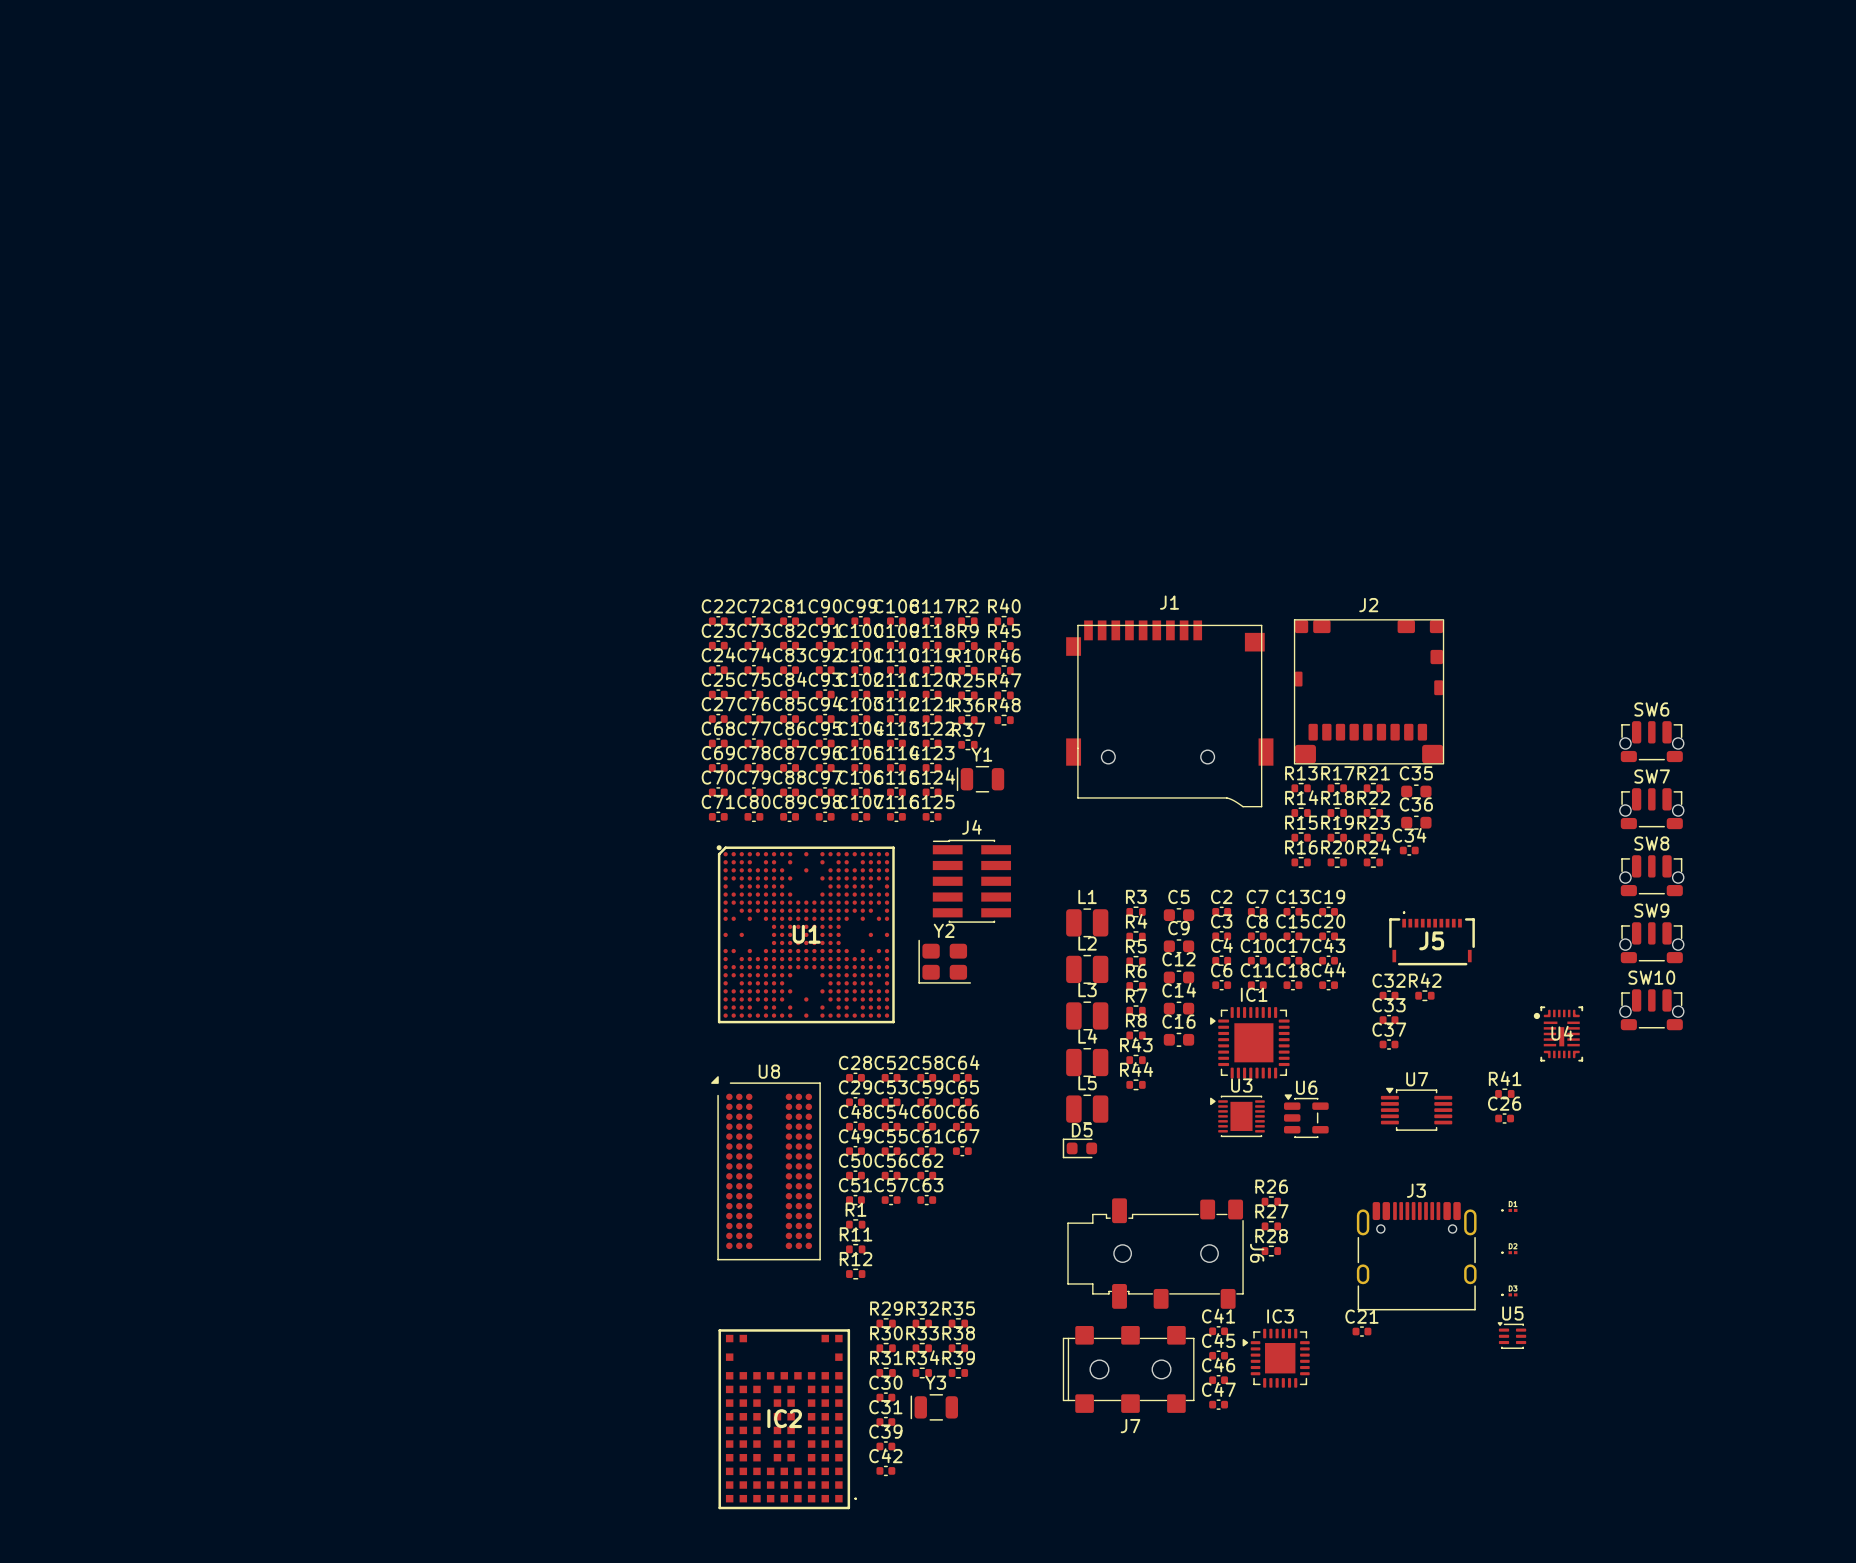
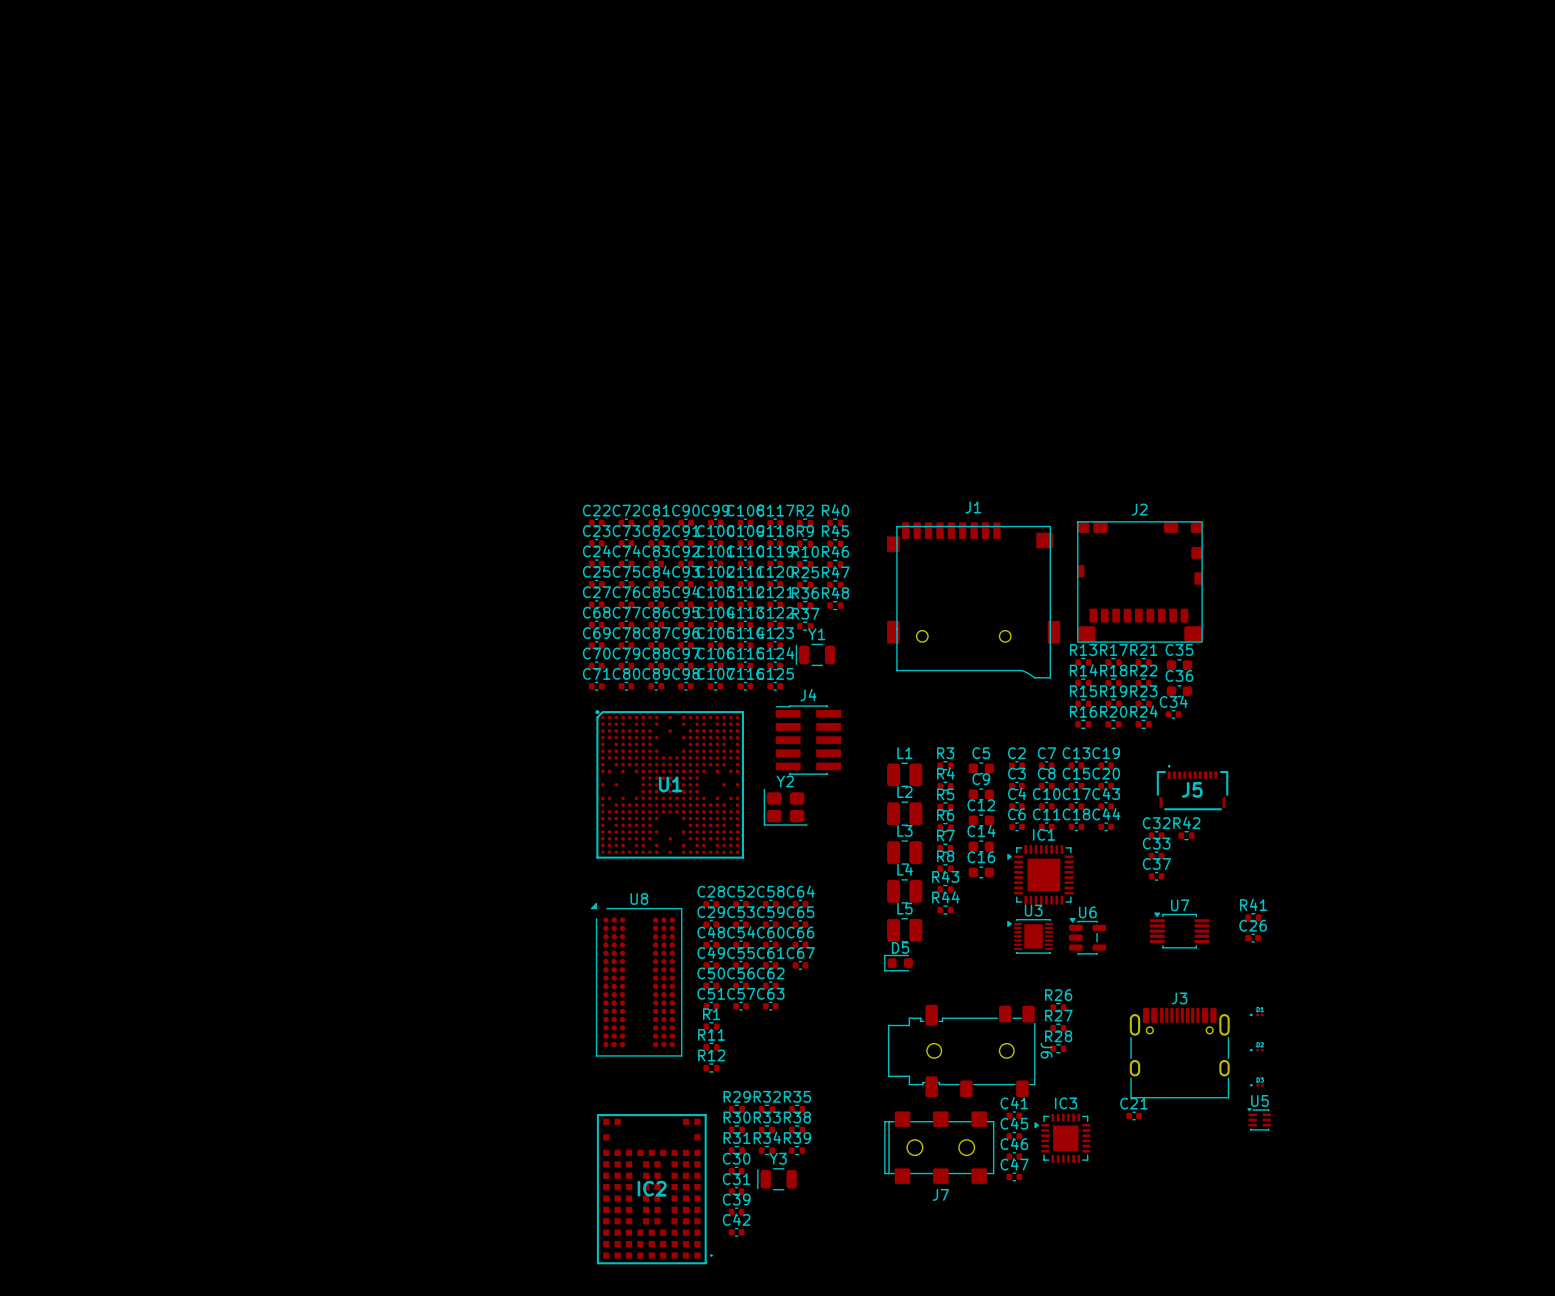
SW6: (1651, 741) -> none
SW7: (1651, 808) -> none
SW8: (1651, 875) -> none
SW9: (1651, 942) -> none
SW10: (1651, 1009) -> none
U4: (1558, 1033) -> none

